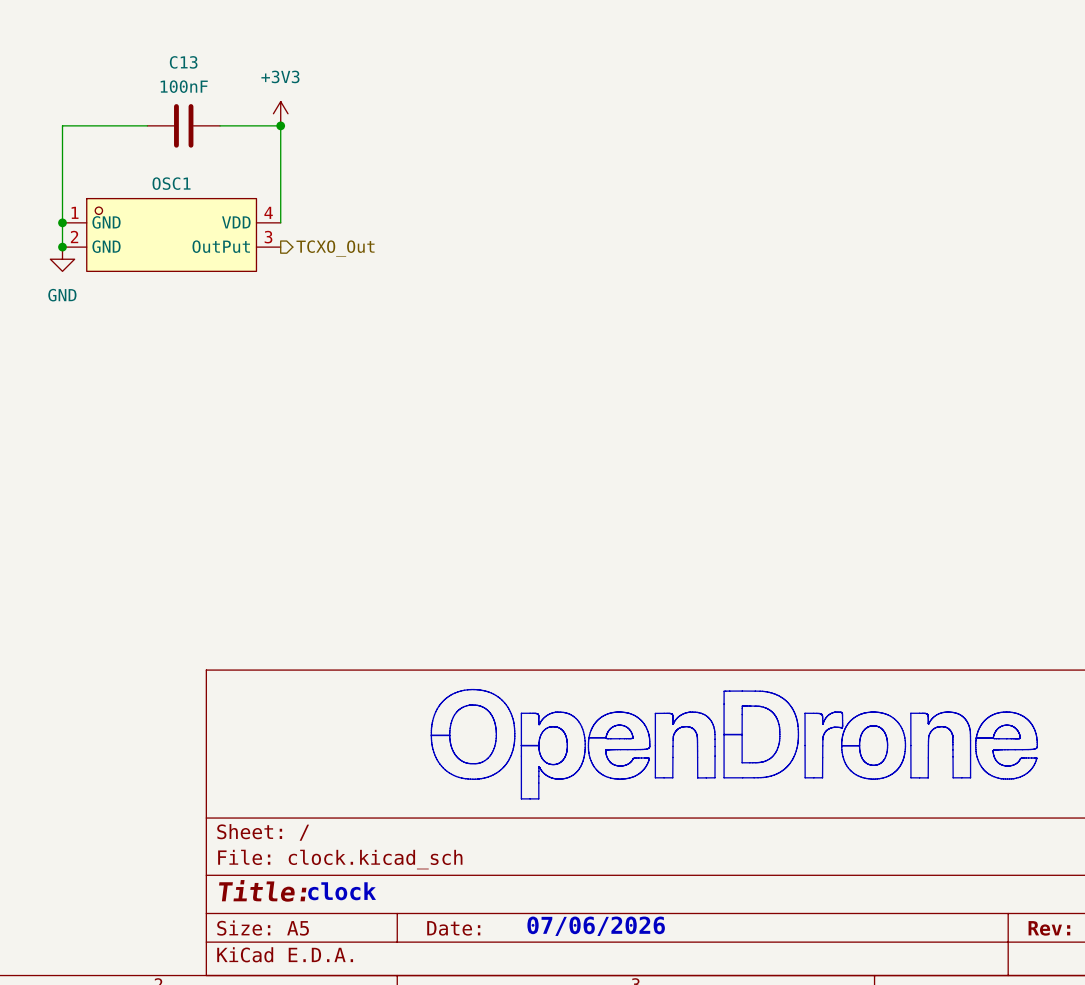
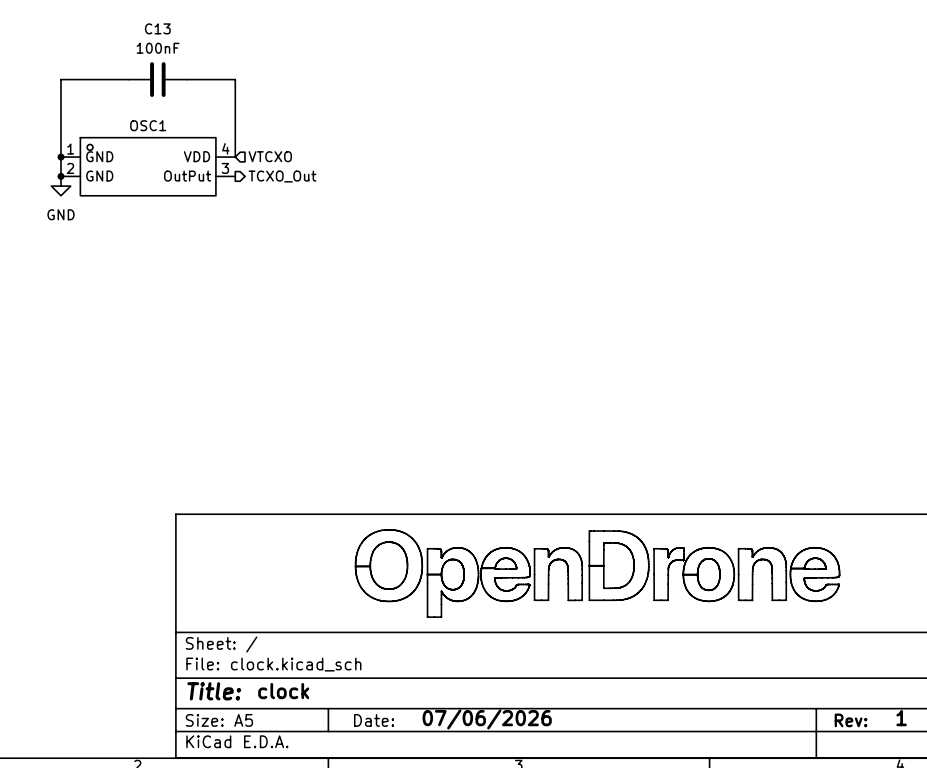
power symbol: +3V3 (280, 113) -> none
junction: (280, 125) -> none
hierarchical label: none -> VTCXO (270, 156)

